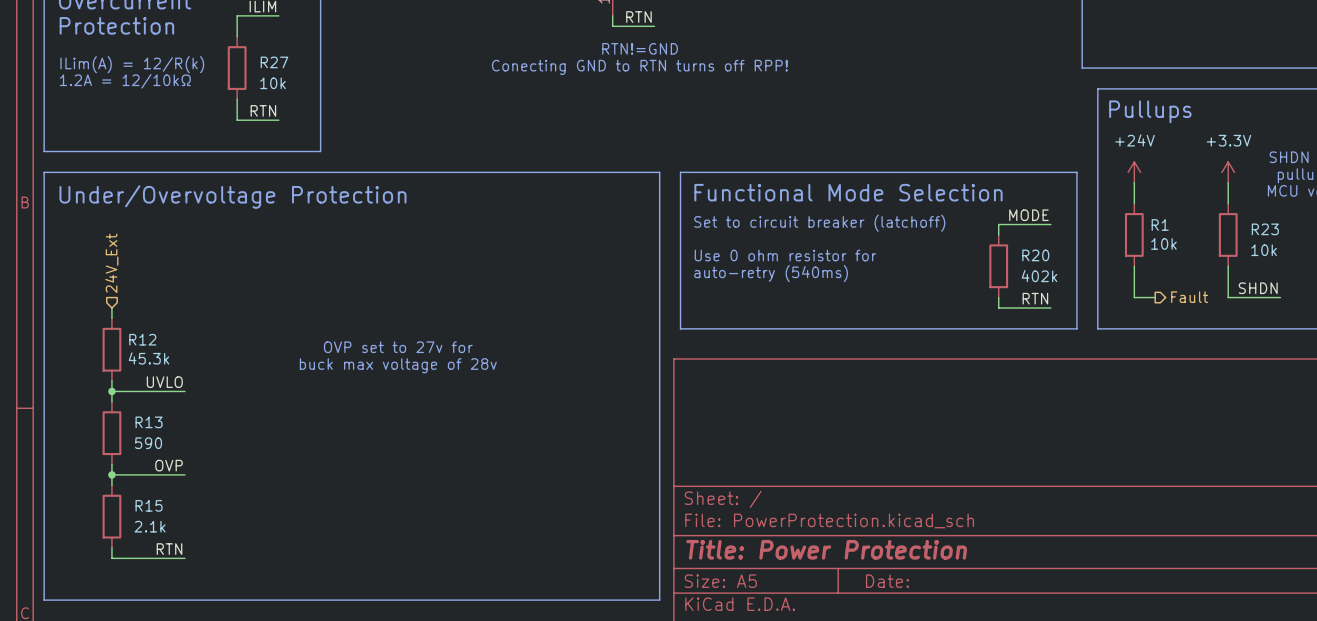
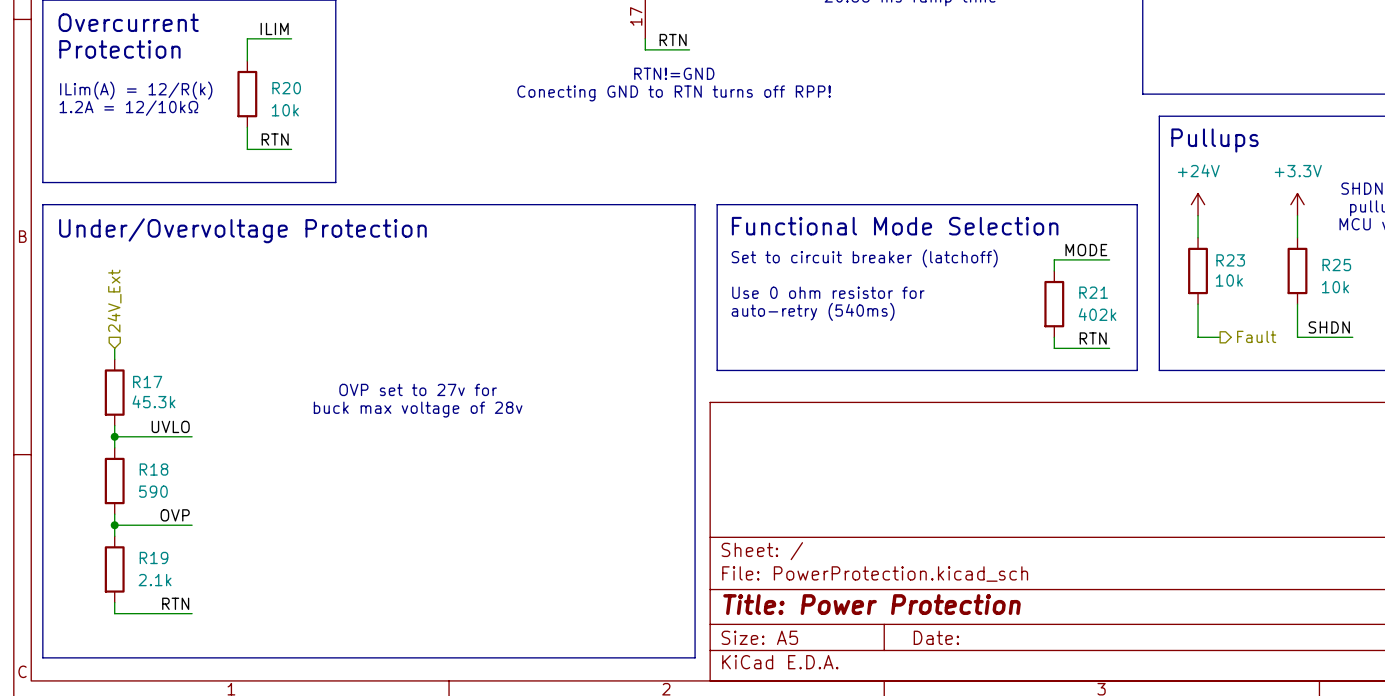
R27 name: R27 (274, 62) -> R20 (286, 88)
R1 name: R1 (1160, 224) -> R23 (1230, 260)
R23 name: R23 (1265, 229) -> R25 (1336, 265)
R20 name: R20 (1035, 255) -> R21 (1093, 292)
R12 name: R12 (142, 339) -> R17 (147, 381)
R13 name: R13 (149, 422) -> R18 (154, 469)
R15 name: R15 (149, 505) -> R19 (154, 557)

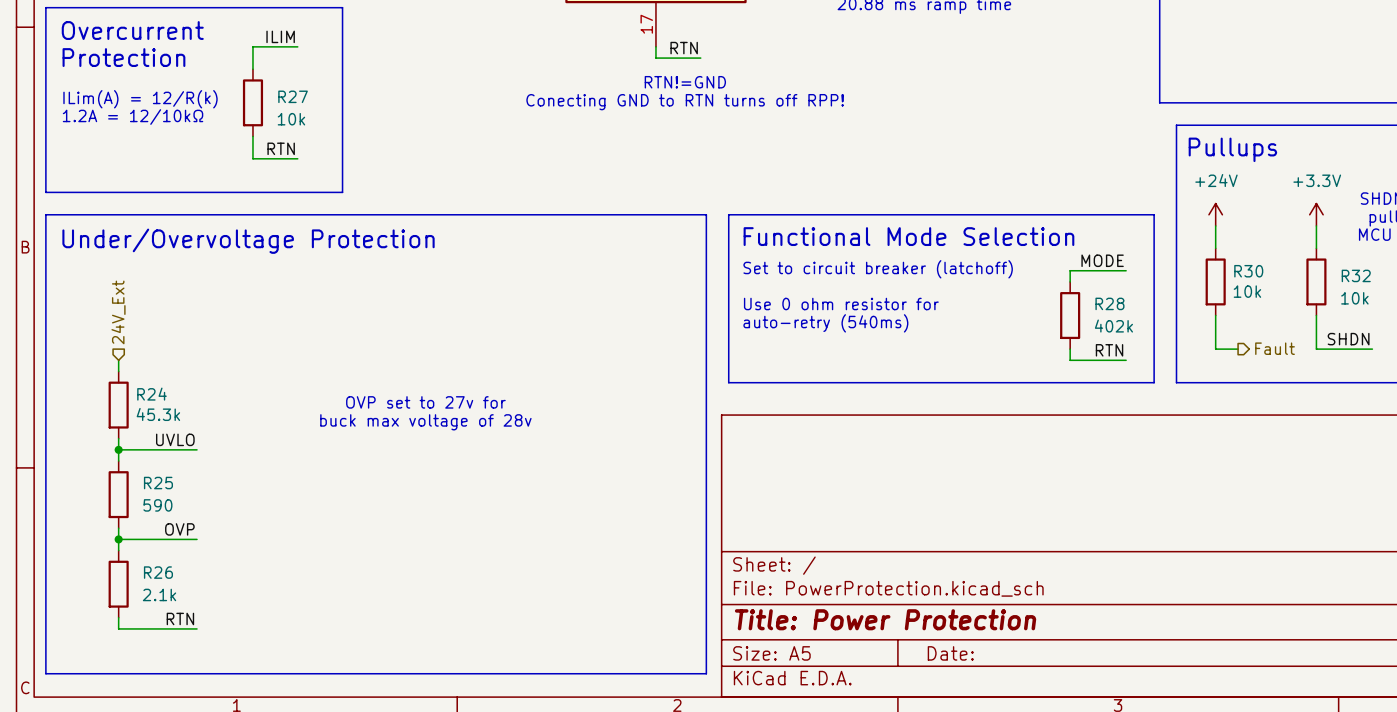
R20 name: R20 (286, 88) -> R27 (293, 96)
R23 name: R23 (1230, 260) -> R30 (1248, 271)
R25 name: R25 (1336, 265) -> R32 (1356, 275)
R21 name: R21 (1093, 292) -> R28 (1109, 303)
R17 name: R17 (147, 381) -> R24 (152, 394)
R18 name: R18 (154, 469) -> R25 (158, 483)
R19 name: R19 (154, 557) -> R26 (158, 572)

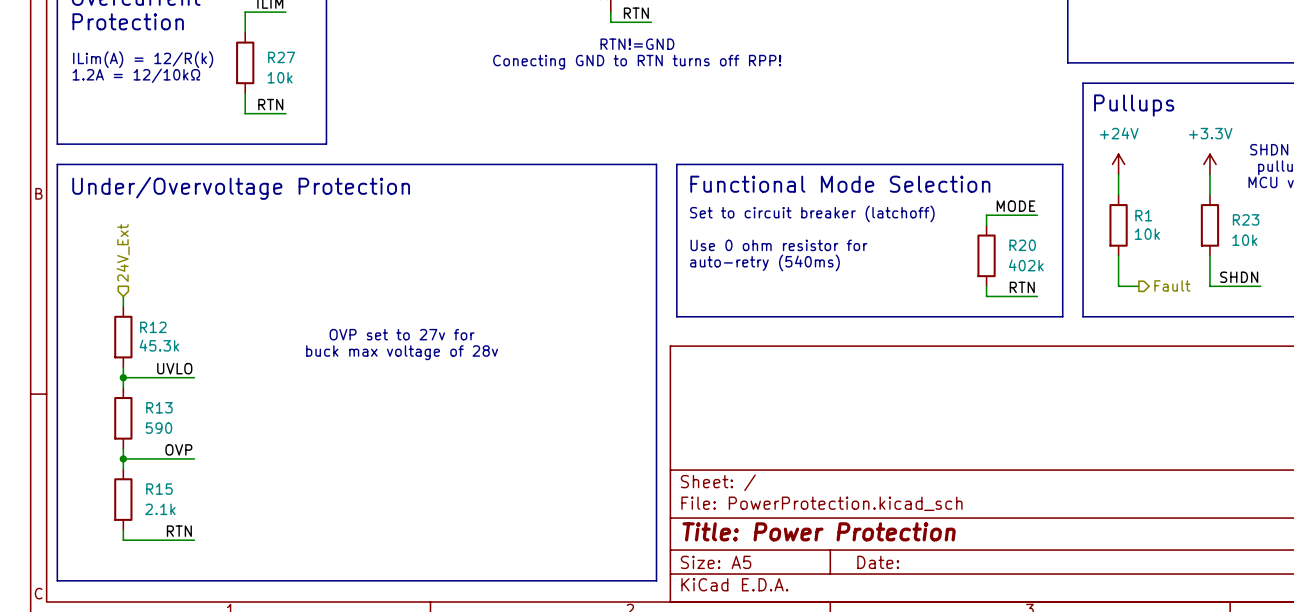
R30 name: R30 (1248, 271) -> R1 (1143, 215)
R32 name: R32 (1356, 275) -> R23 (1246, 219)
R28 name: R28 (1109, 303) -> R20 (1022, 245)
R24 name: R24 (152, 394) -> R12 (153, 327)
R25 name: R25 (158, 483) -> R13 (159, 407)
R26 name: R26 (158, 572) -> R15 (159, 489)

